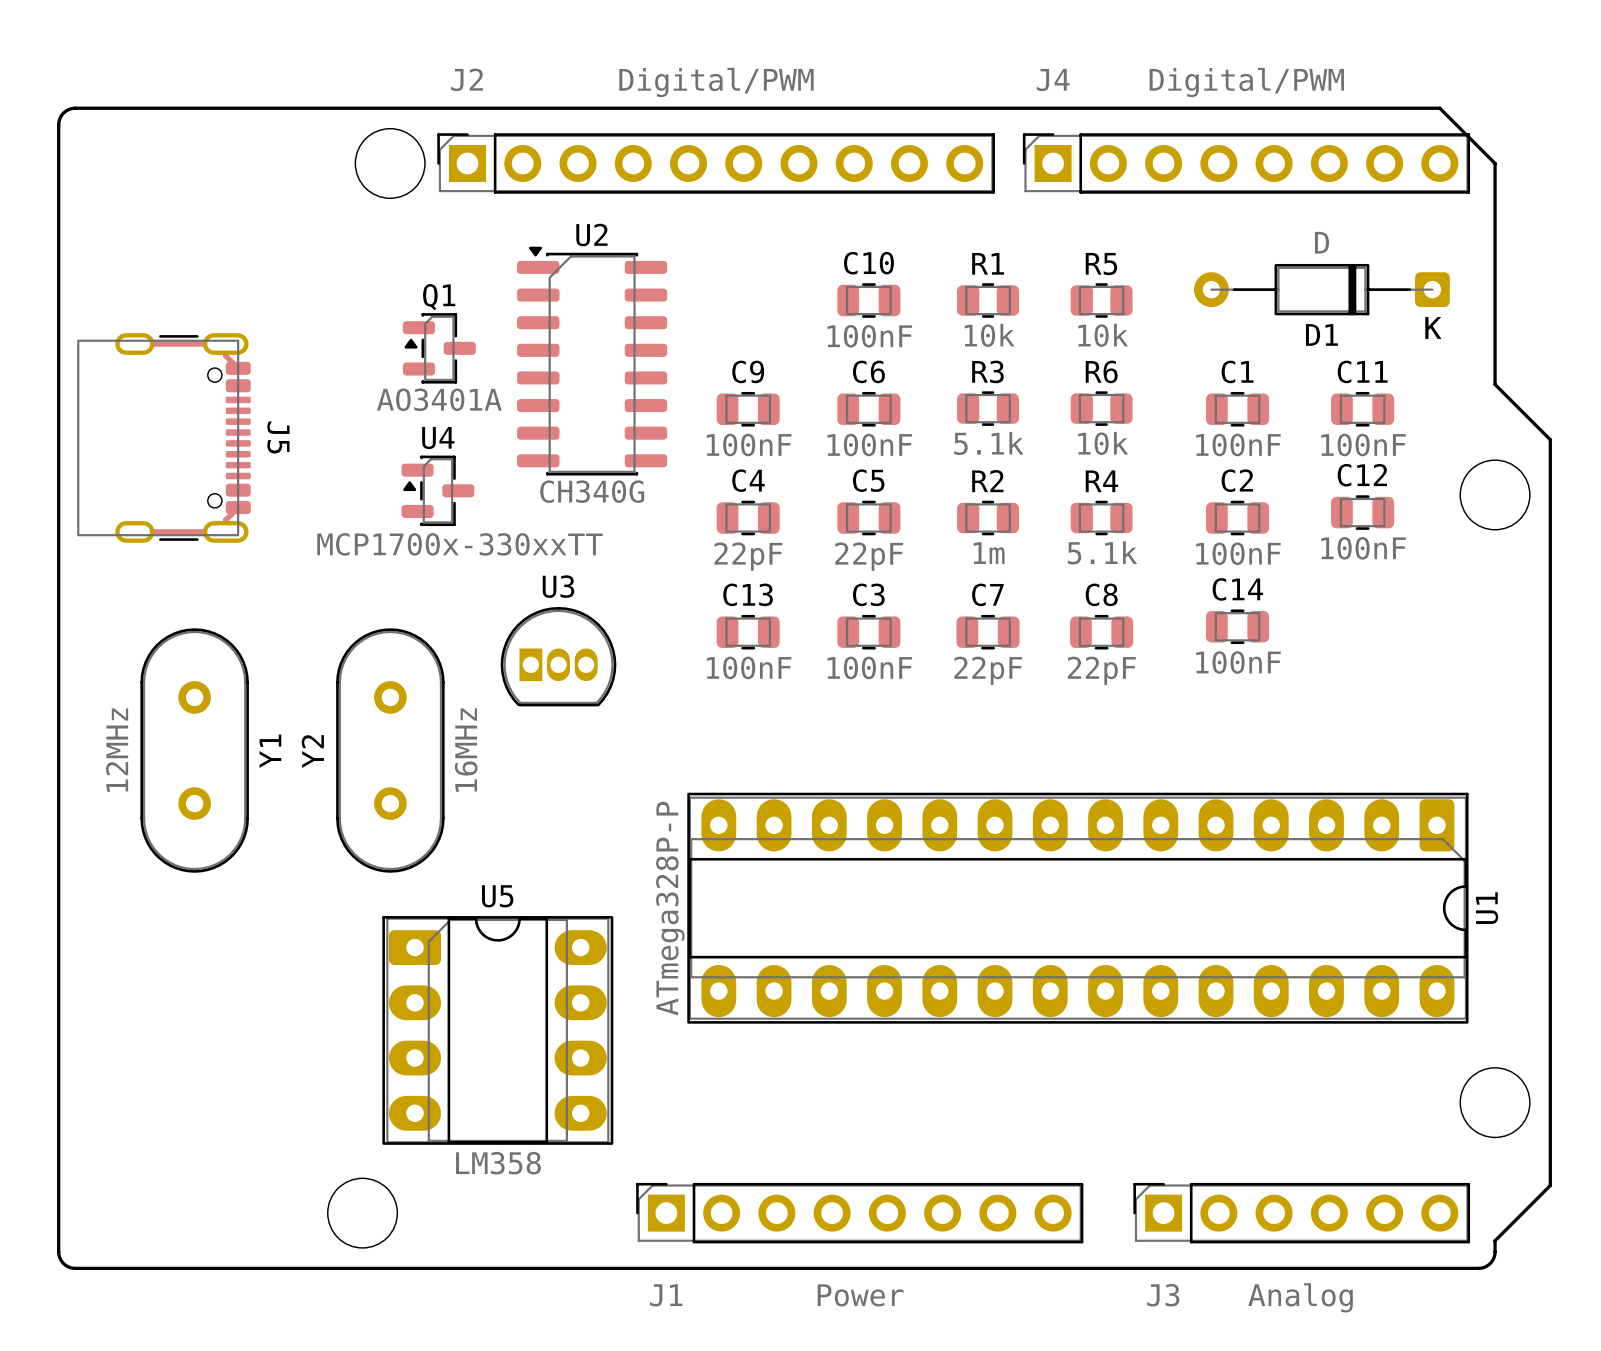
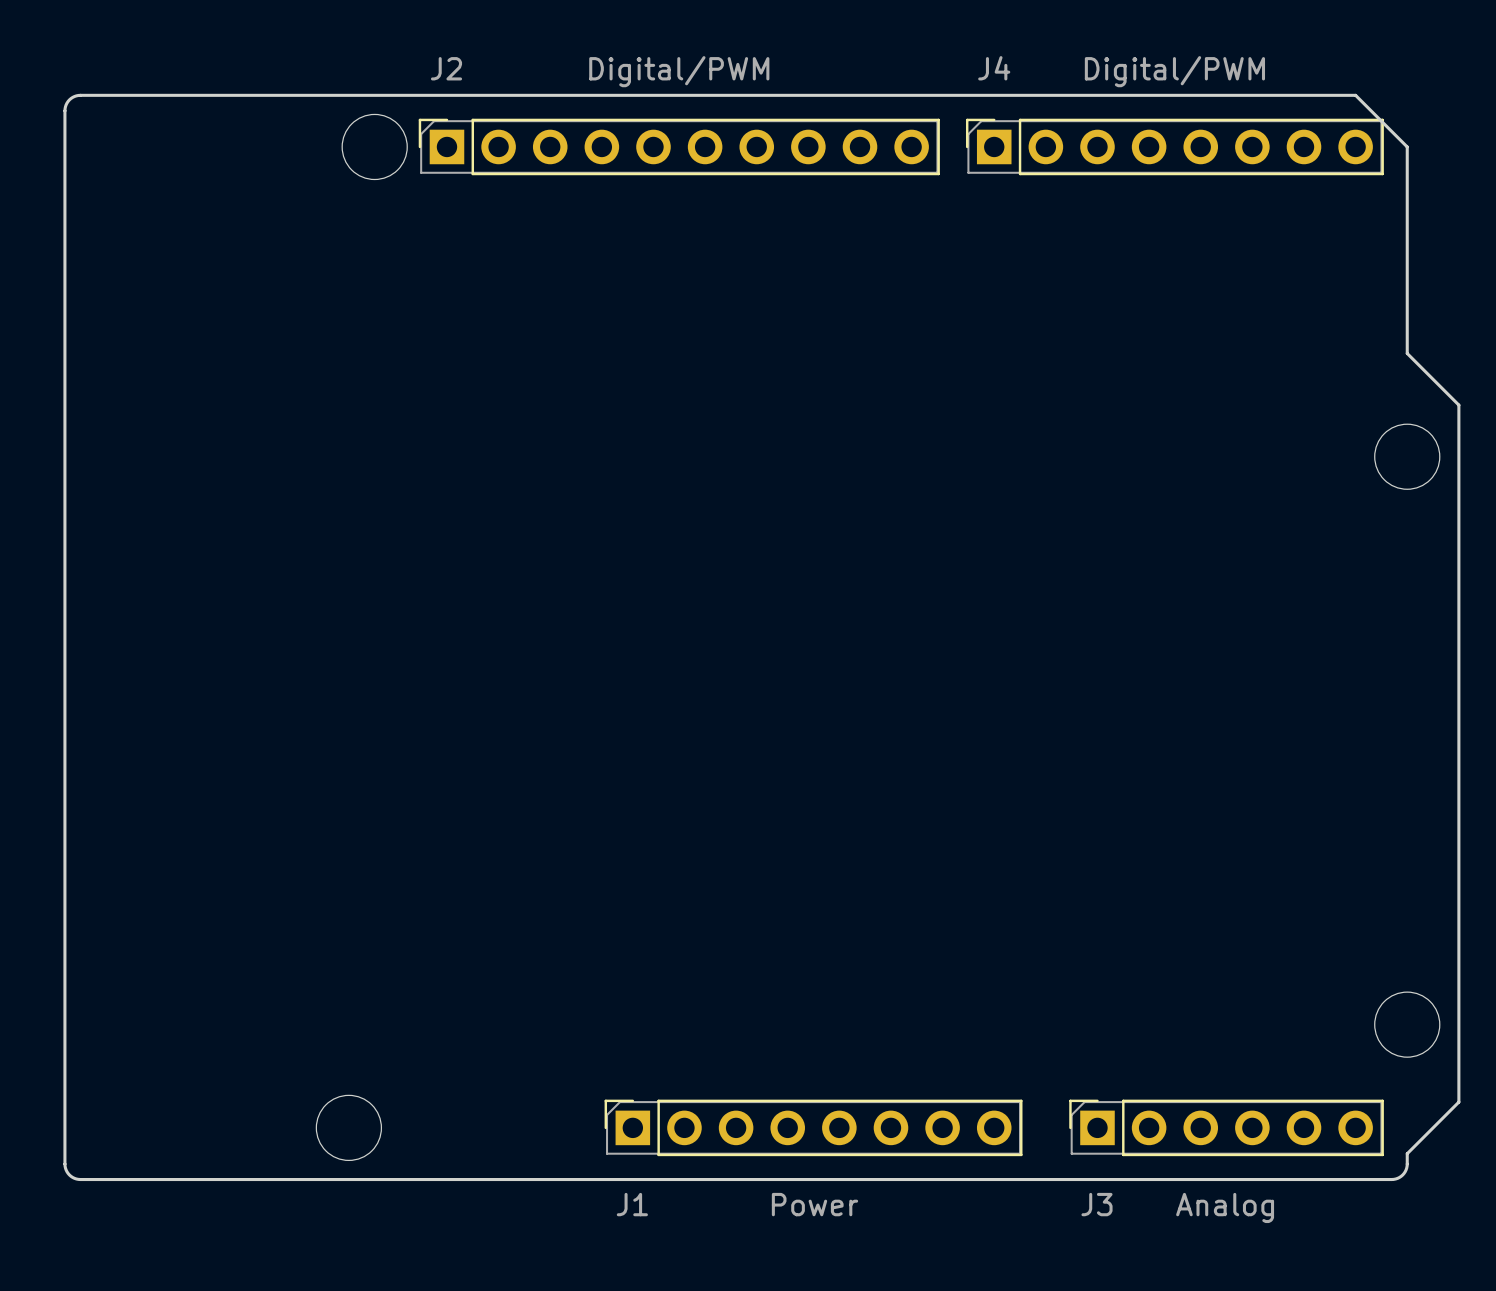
D1: D (1321, 289) -> none
C10: 100nF (868, 300) -> none
R1: 10k (988, 300) -> none
R5: 10k (1101, 300) -> none
top track: (134, 344) (225, 344) (225, 355) (238, 368) -> none
Q1: AO3401A (439, 348) -> none
U2: CH340G (592, 361) -> none
R3: 5.1k (988, 408) -> none
R6: 10k (1101, 408) -> none
C9: 100nF (748, 409) -> none
C6: 100nF (868, 409) -> none
C1: 100nF (1237, 409) -> none
C11: 100nF (1362, 409) -> none
J5: (163, 437) -> none
U4: MCP1700x-330xxTT (437, 490) -> none
top track: (238, 507) (225, 520) (225, 531) (134, 531) -> none
C12: 100nF (1362, 512) -> none
C4: 22pF (748, 518) -> none
C5: 22pF (868, 518) -> none
R2: 1m (988, 518) -> none
R4: 5.1k (1101, 518) -> none
C2: 100nF (1237, 518) -> none
C14: 100nF (1237, 626) -> none
C13: 100nF (748, 632) -> none
C3: 100nF (868, 632) -> none
C7: 22pF (988, 632) -> none
C8: 22pF (1101, 632) -> none
U3: (558, 656) -> none
Y1: 12MHz (194, 750) -> none
Y2: 16MHz (390, 750) -> none
U1: ATmega328P-P (1077, 908) -> none
U5: LM358 (497, 1030) -> none

